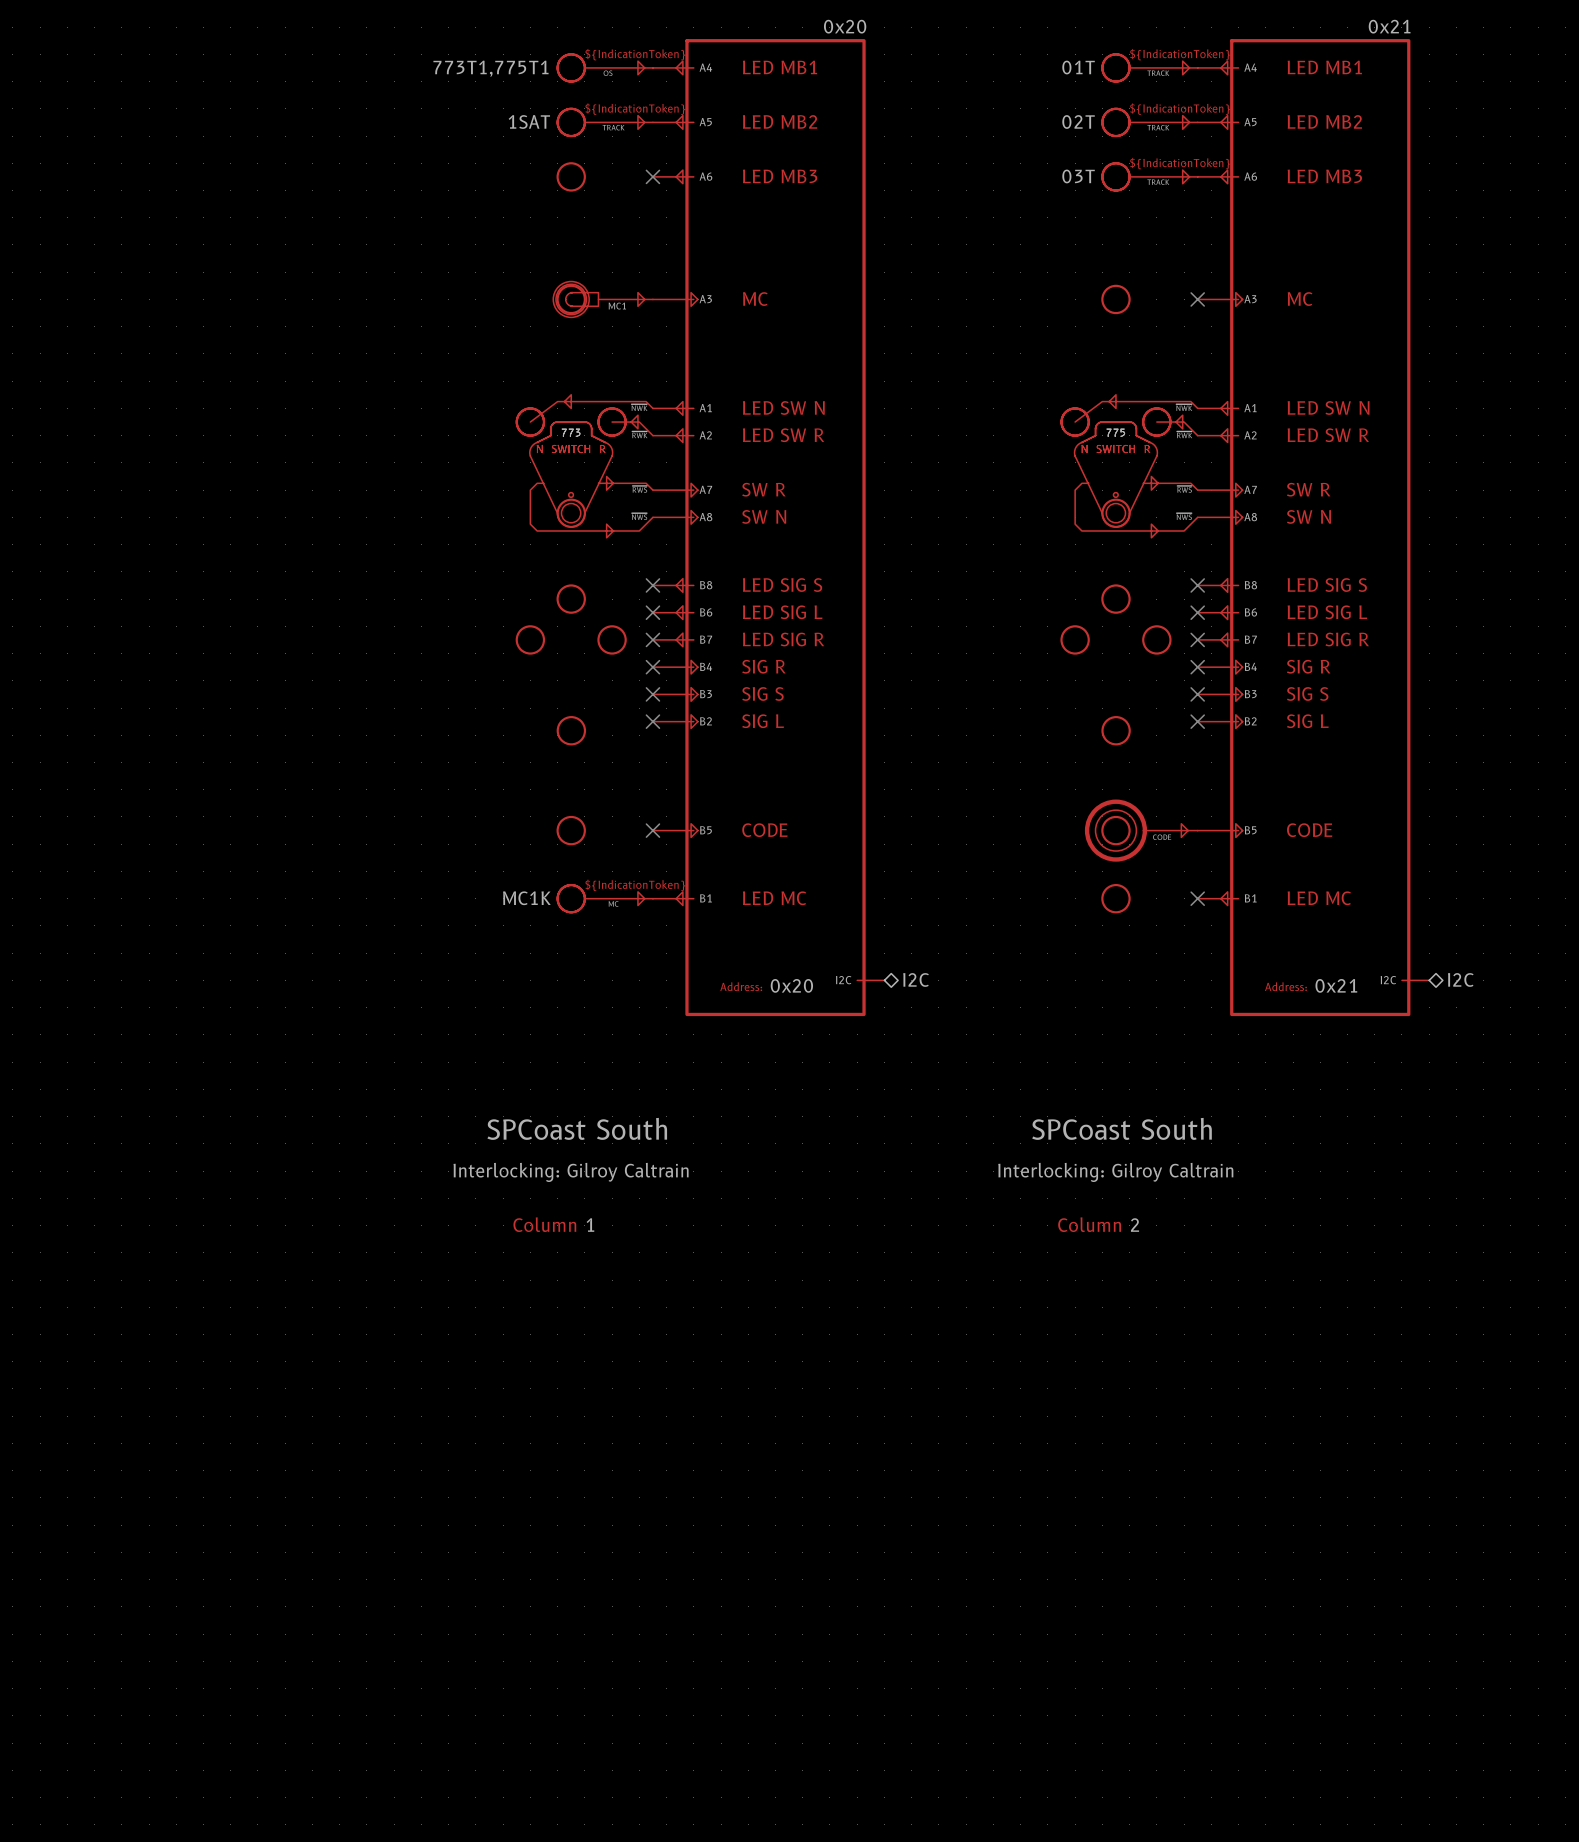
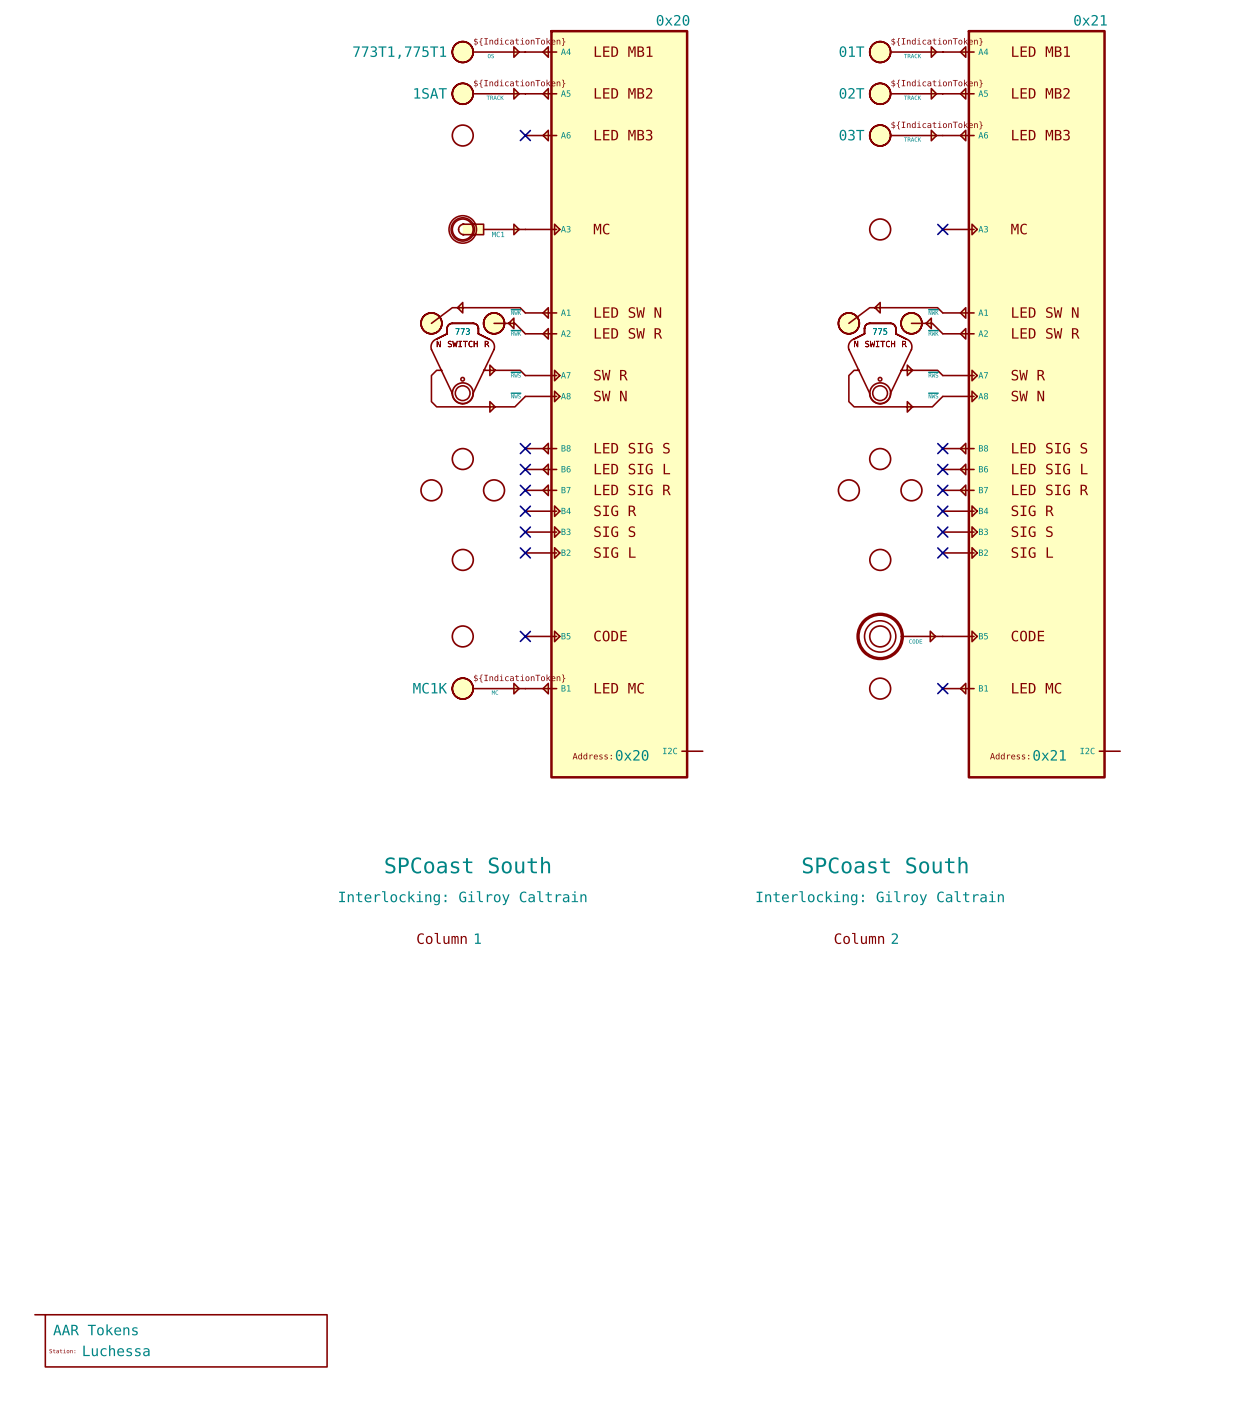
hierarchical label: I2C (916, 979) -> none
hierarchical label: I2C (1460, 979) -> none
part: none -> AAR Tokens (180, 1340)

